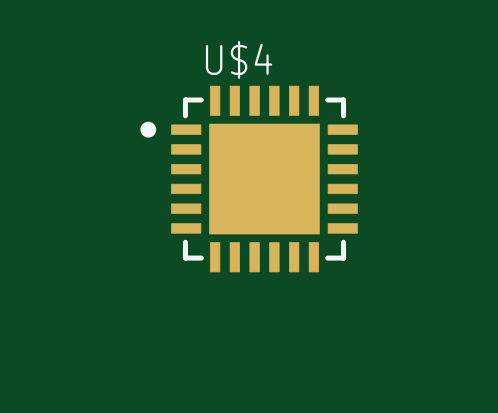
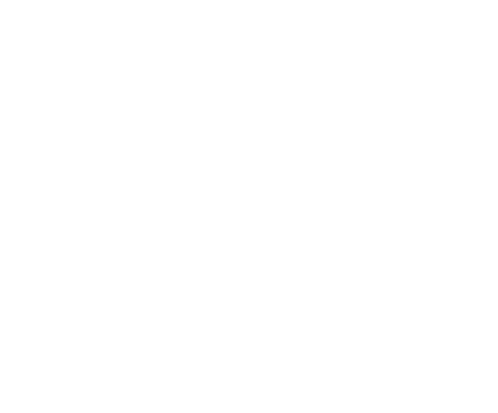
U$4: (249, 179) -> none

